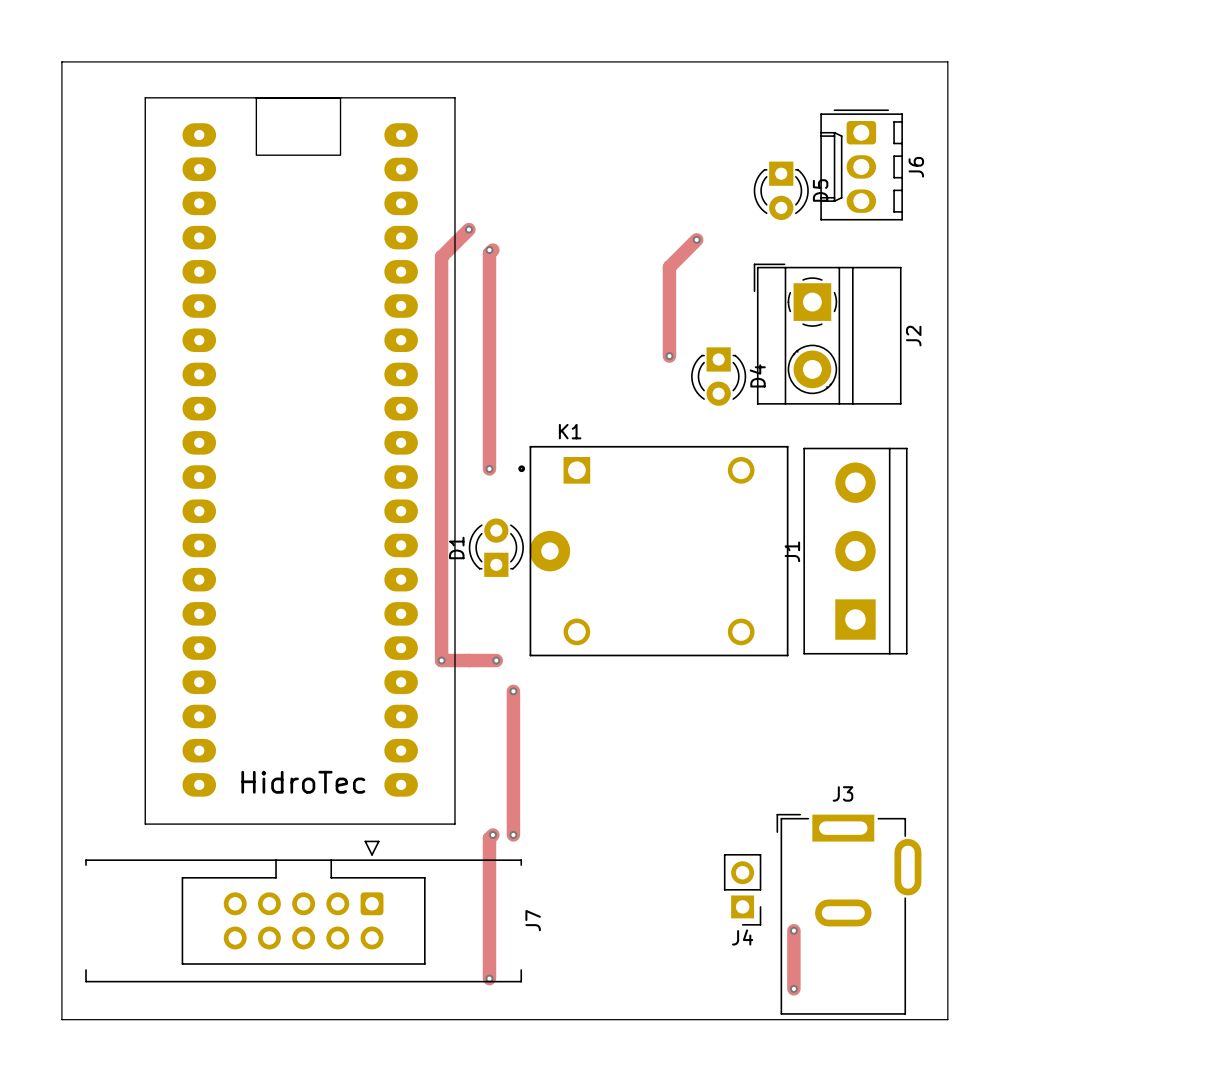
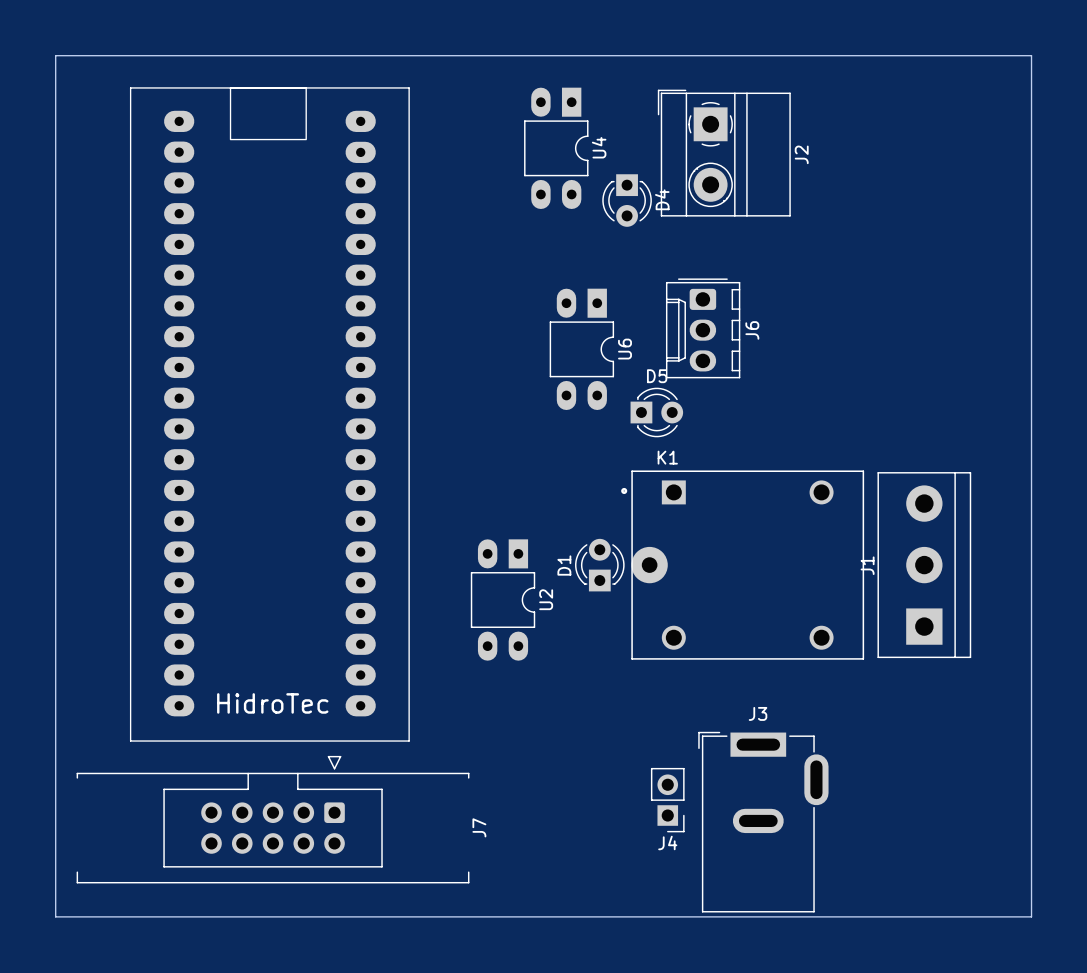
board edge: (947, 61) (947, 1019) -> (852, 55) (1031, 55) (1031, 916) (852, 916)
U4: none -> (556, 148)
J6 position: (861, 164) -> (703, 328)
D5 rotation: 0° (781, 190) -> 90° counterclockwise (656, 412)
D5 position: (781, 190) -> (656, 412)
track: (468, 229) (441, 256) (441, 660) (496, 660) -> none
via: (468, 229) -> none
track: (696, 239) (669, 267) (669, 356) -> none
via: (696, 239) -> none
via: (489, 250) -> none
track: (492, 250) (489, 253) (489, 468) -> none
J2 position: (827, 334) -> (724, 153)
via: (669, 356) -> none
D4 position: (718, 376) -> (627, 200)
U6: none -> (581, 349)
via: (489, 468) -> none
D1 position: (496, 547) -> (599, 565)
K1 position: (653, 551) -> (742, 565)
J1 position: (855, 551) -> (924, 565)
via: (441, 660) -> none
via: (496, 660) -> none
U2: none -> (503, 600)
track: (513, 691) (513, 834) -> none
via: (513, 691) -> none
track: (492, 834) (489, 838) (489, 978) -> none
via: (492, 834) -> none
via: (513, 834) -> none
track: (793, 930) (793, 988) -> none
via: (793, 930) -> none
via: (489, 978) -> none
via: (793, 988) -> none

